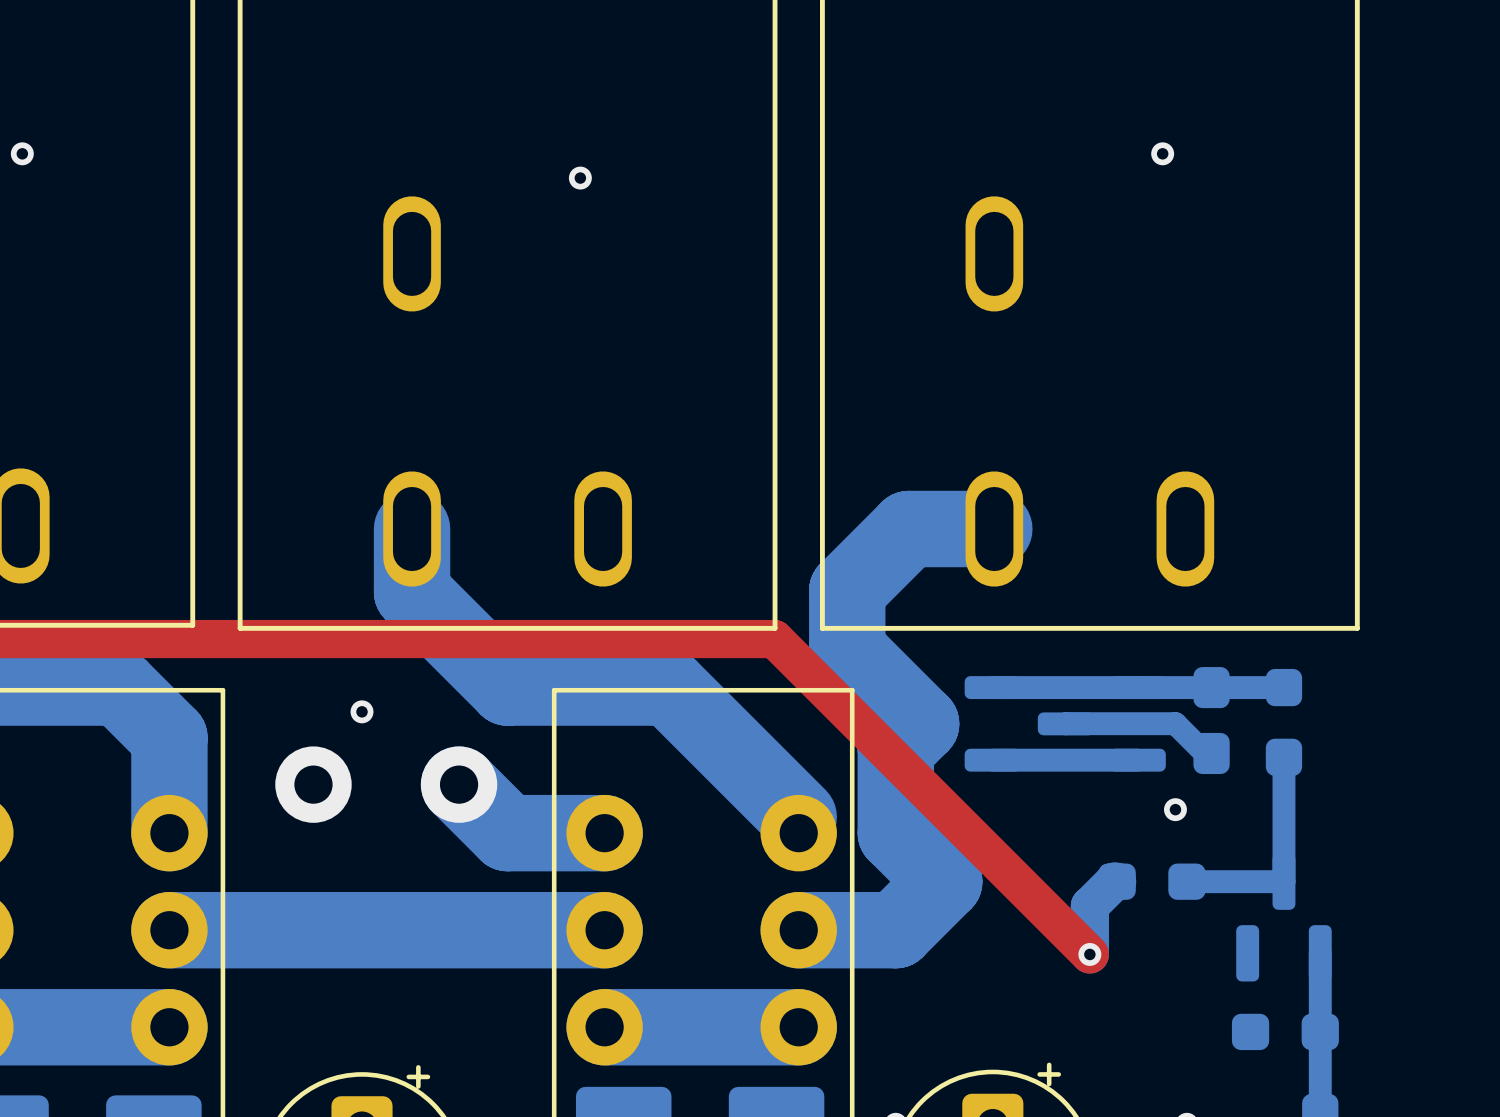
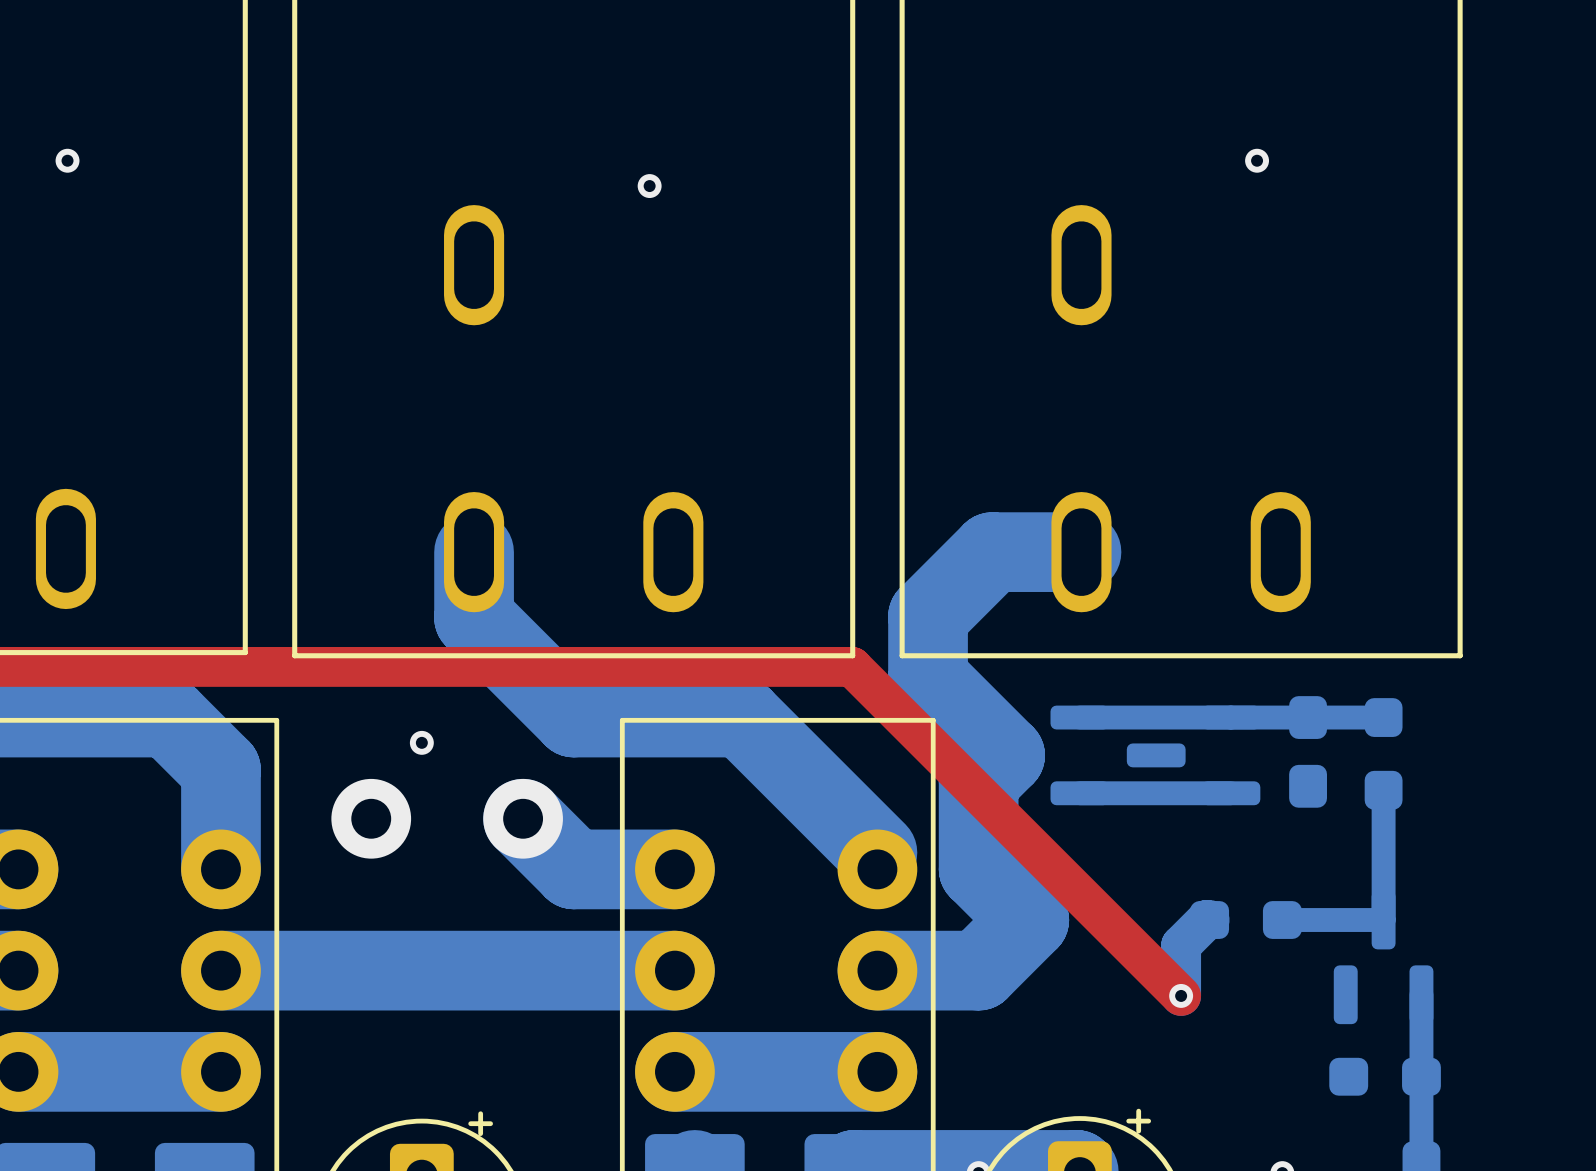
bottom track: (1066, 723) (1175, 723) (1205, 753) (1211, 753) -> none
via: (1175, 809) -> none

